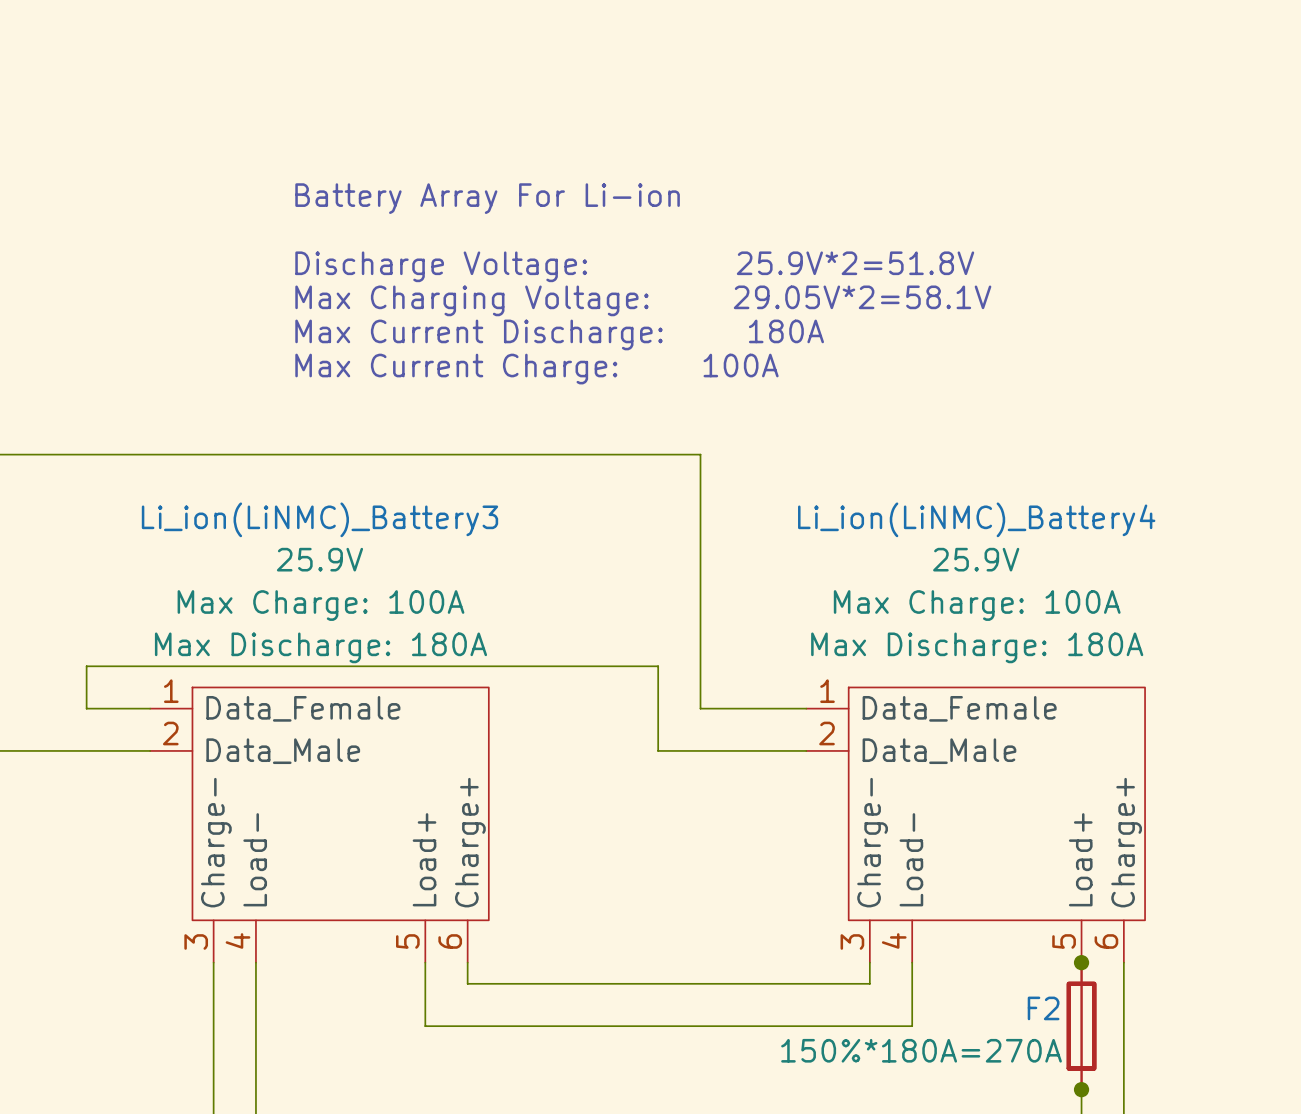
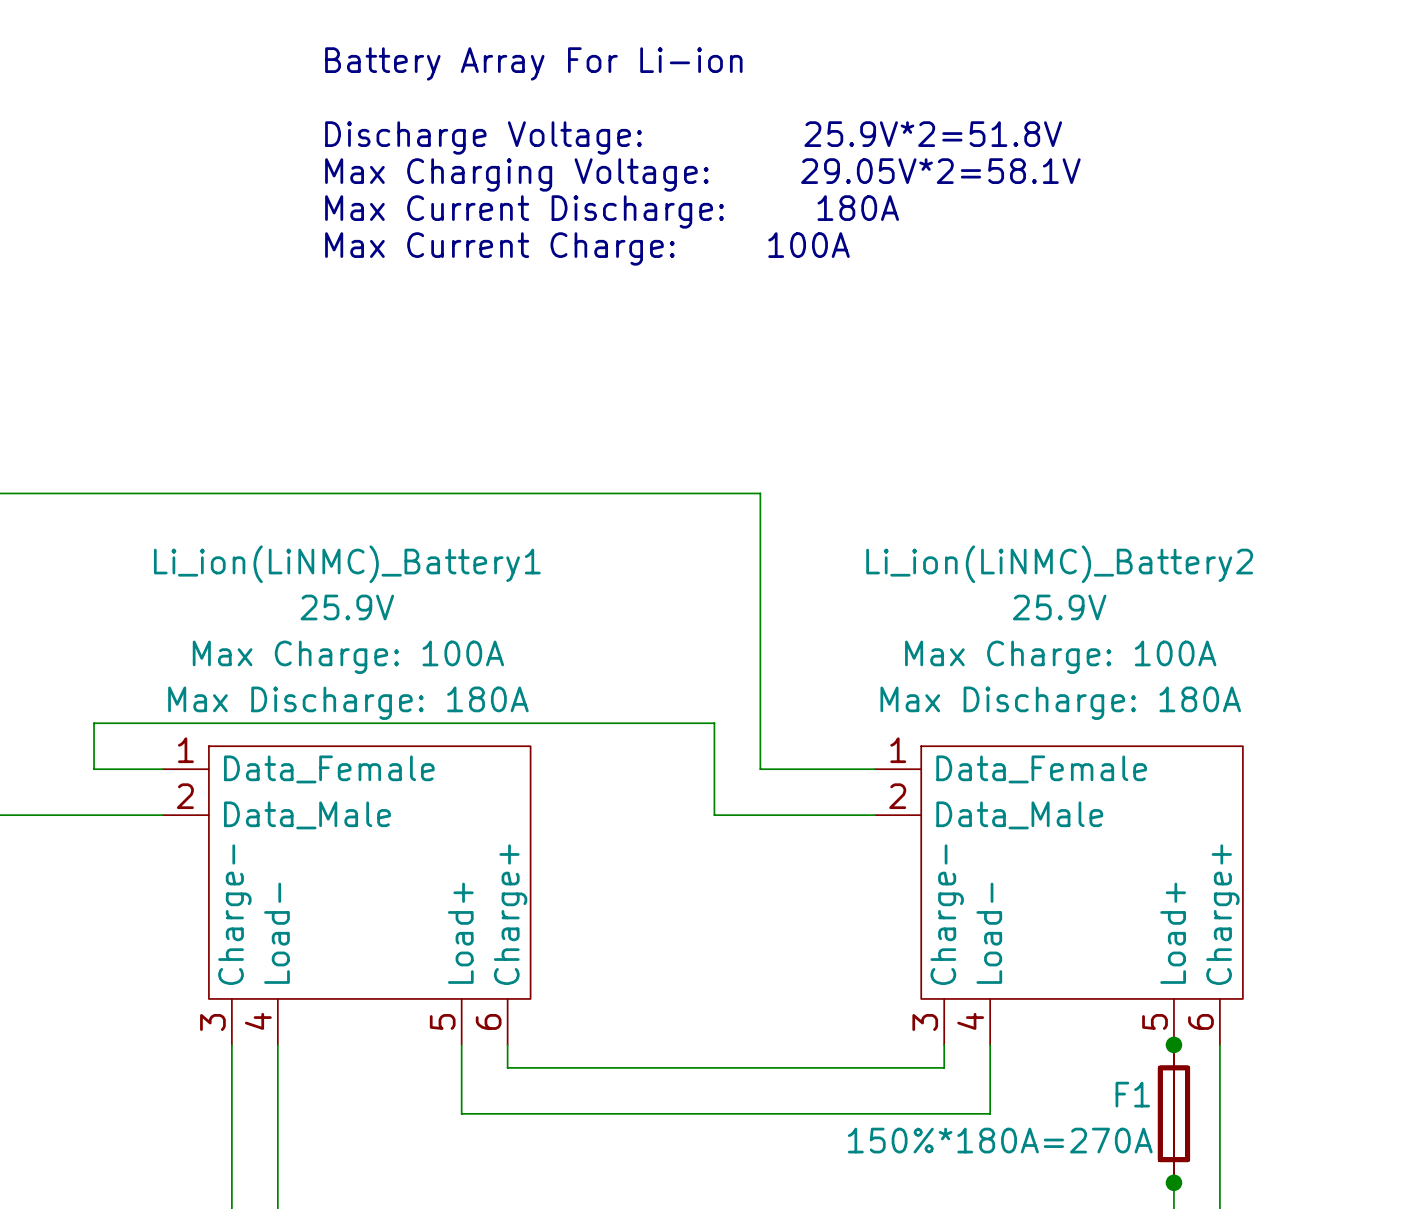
text: none -> Battery Array For Li-ion (533, 63)
text: Battery Array For Li-ion (487, 198) -> Max Current Discharge: 180A (612, 211)
text position: Discharge Voltage: 25.9V*2=51.8V (634, 266) -> Discharge Voltage: 25.9V*2=51.8V (693, 137)
text position: Max Charging Voltage: 29.05V*2=58.1V (643, 300) -> Max Charging Voltage: 29.05V*2=58.1V (702, 174)
text: Max Current Discharge: 180A (559, 334) -> none
text position: Max Current Charge: 100A (536, 369) -> Max Current Charge: 100A (587, 248)
Li_ion(LiNMC)_Battery3 name: Li_ion(LiNMC)_Battery3 (319, 519) -> Li_ion(LiNMC)_Battery1 (347, 564)
Li_ion(LiNMC)_Battery4 name: Li_ion(LiNMC)_Battery4 (976, 519) -> Li_ion(LiNMC)_Battery2 (1059, 564)
F2 name: F2 (1043, 1008) -> F1 (1132, 1094)

